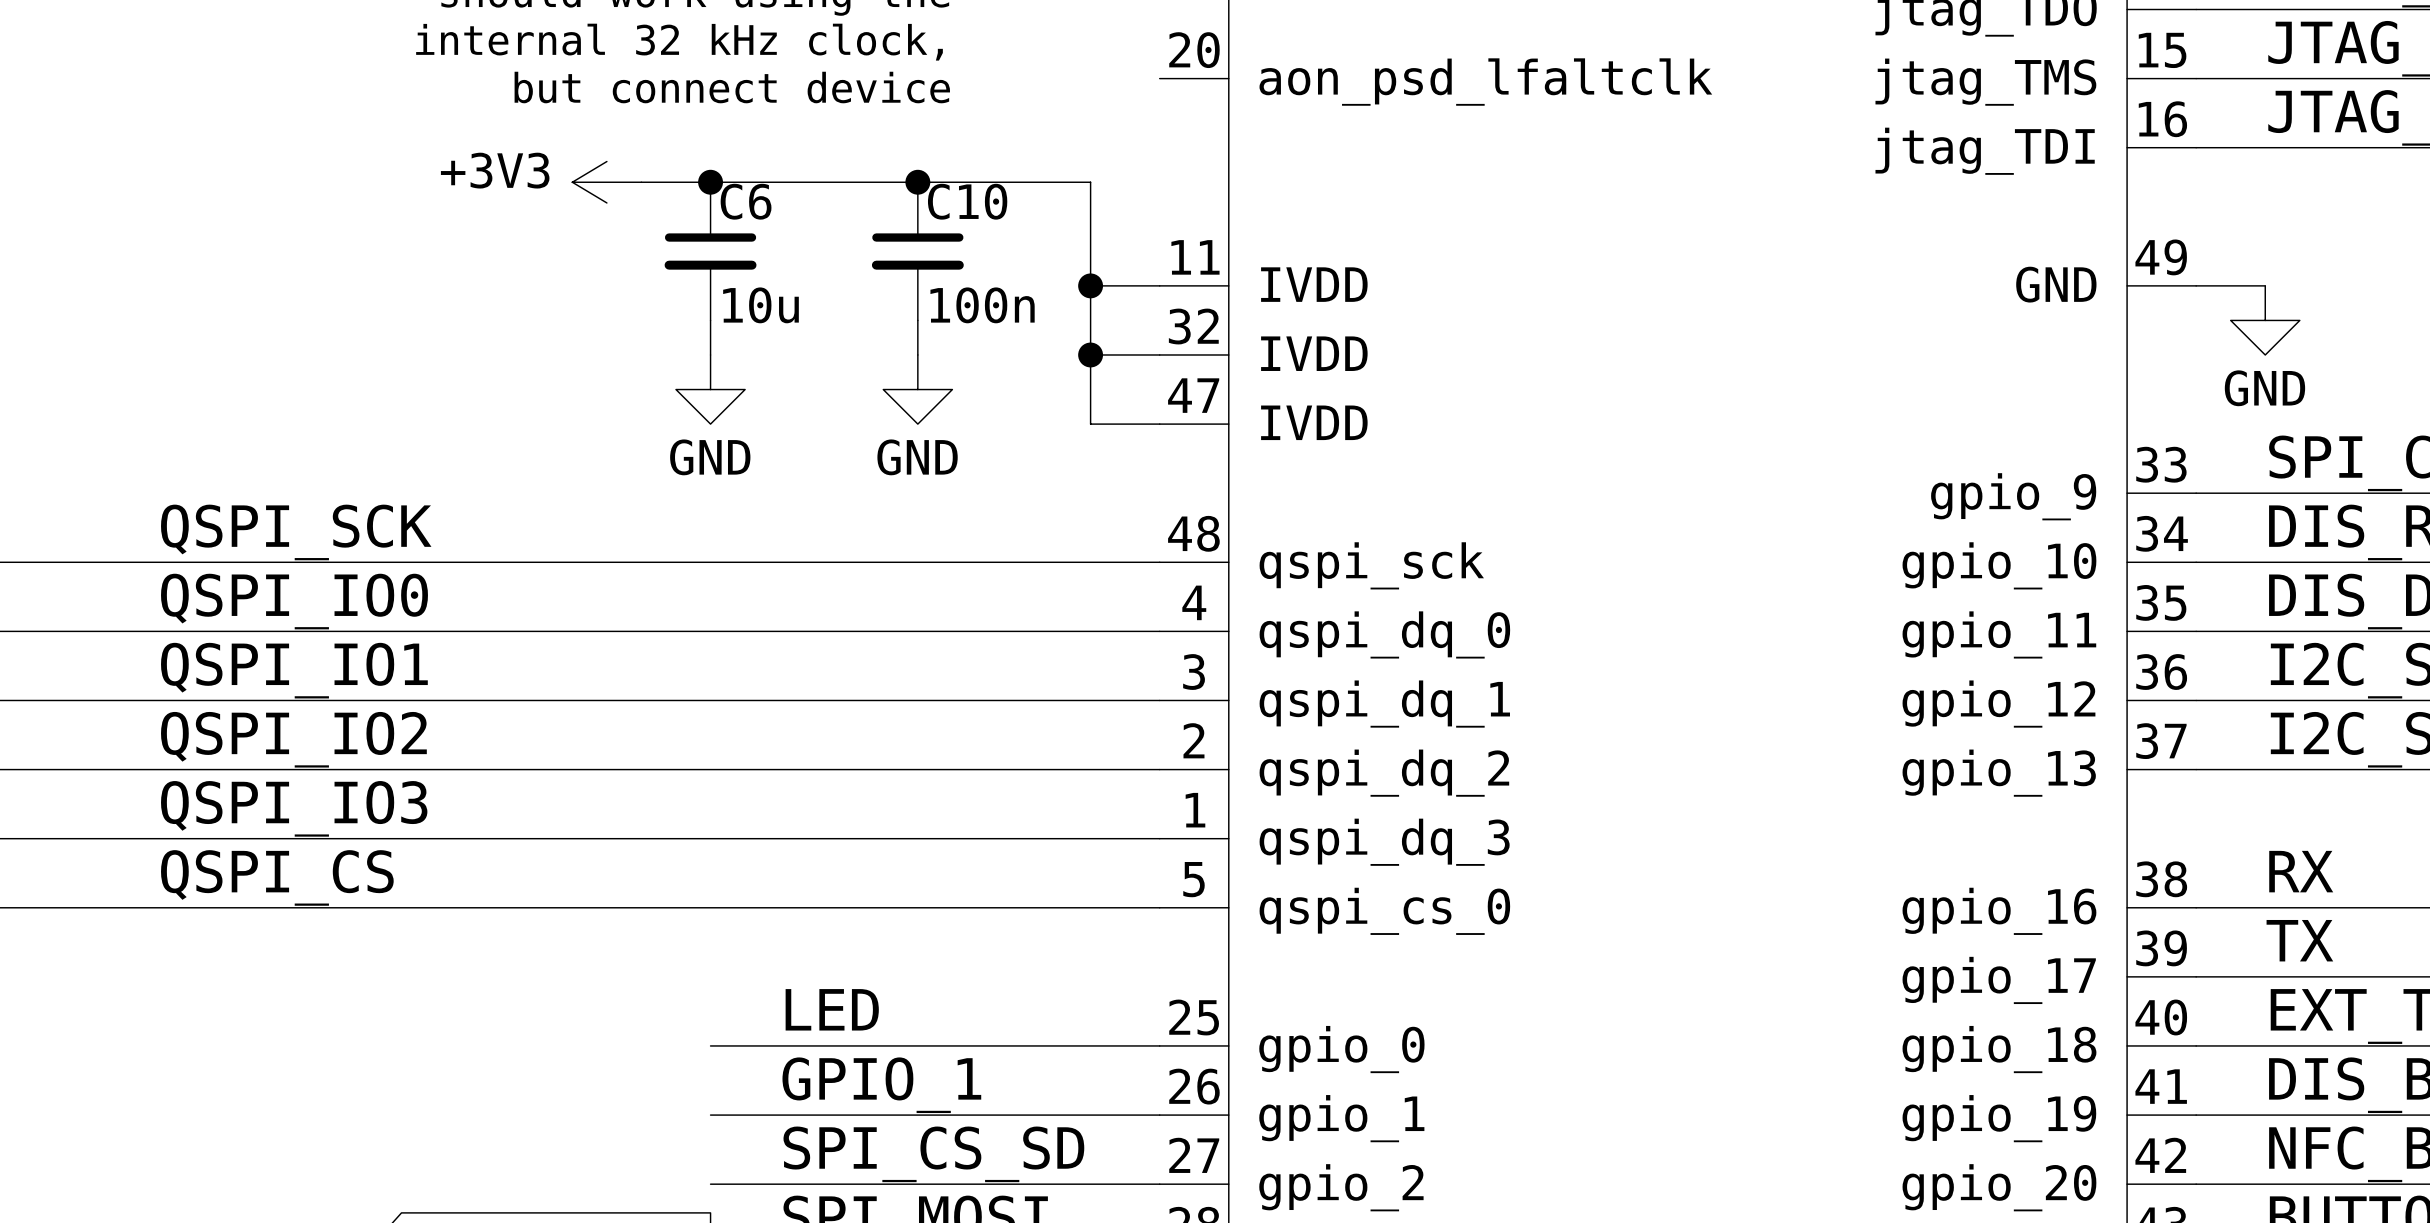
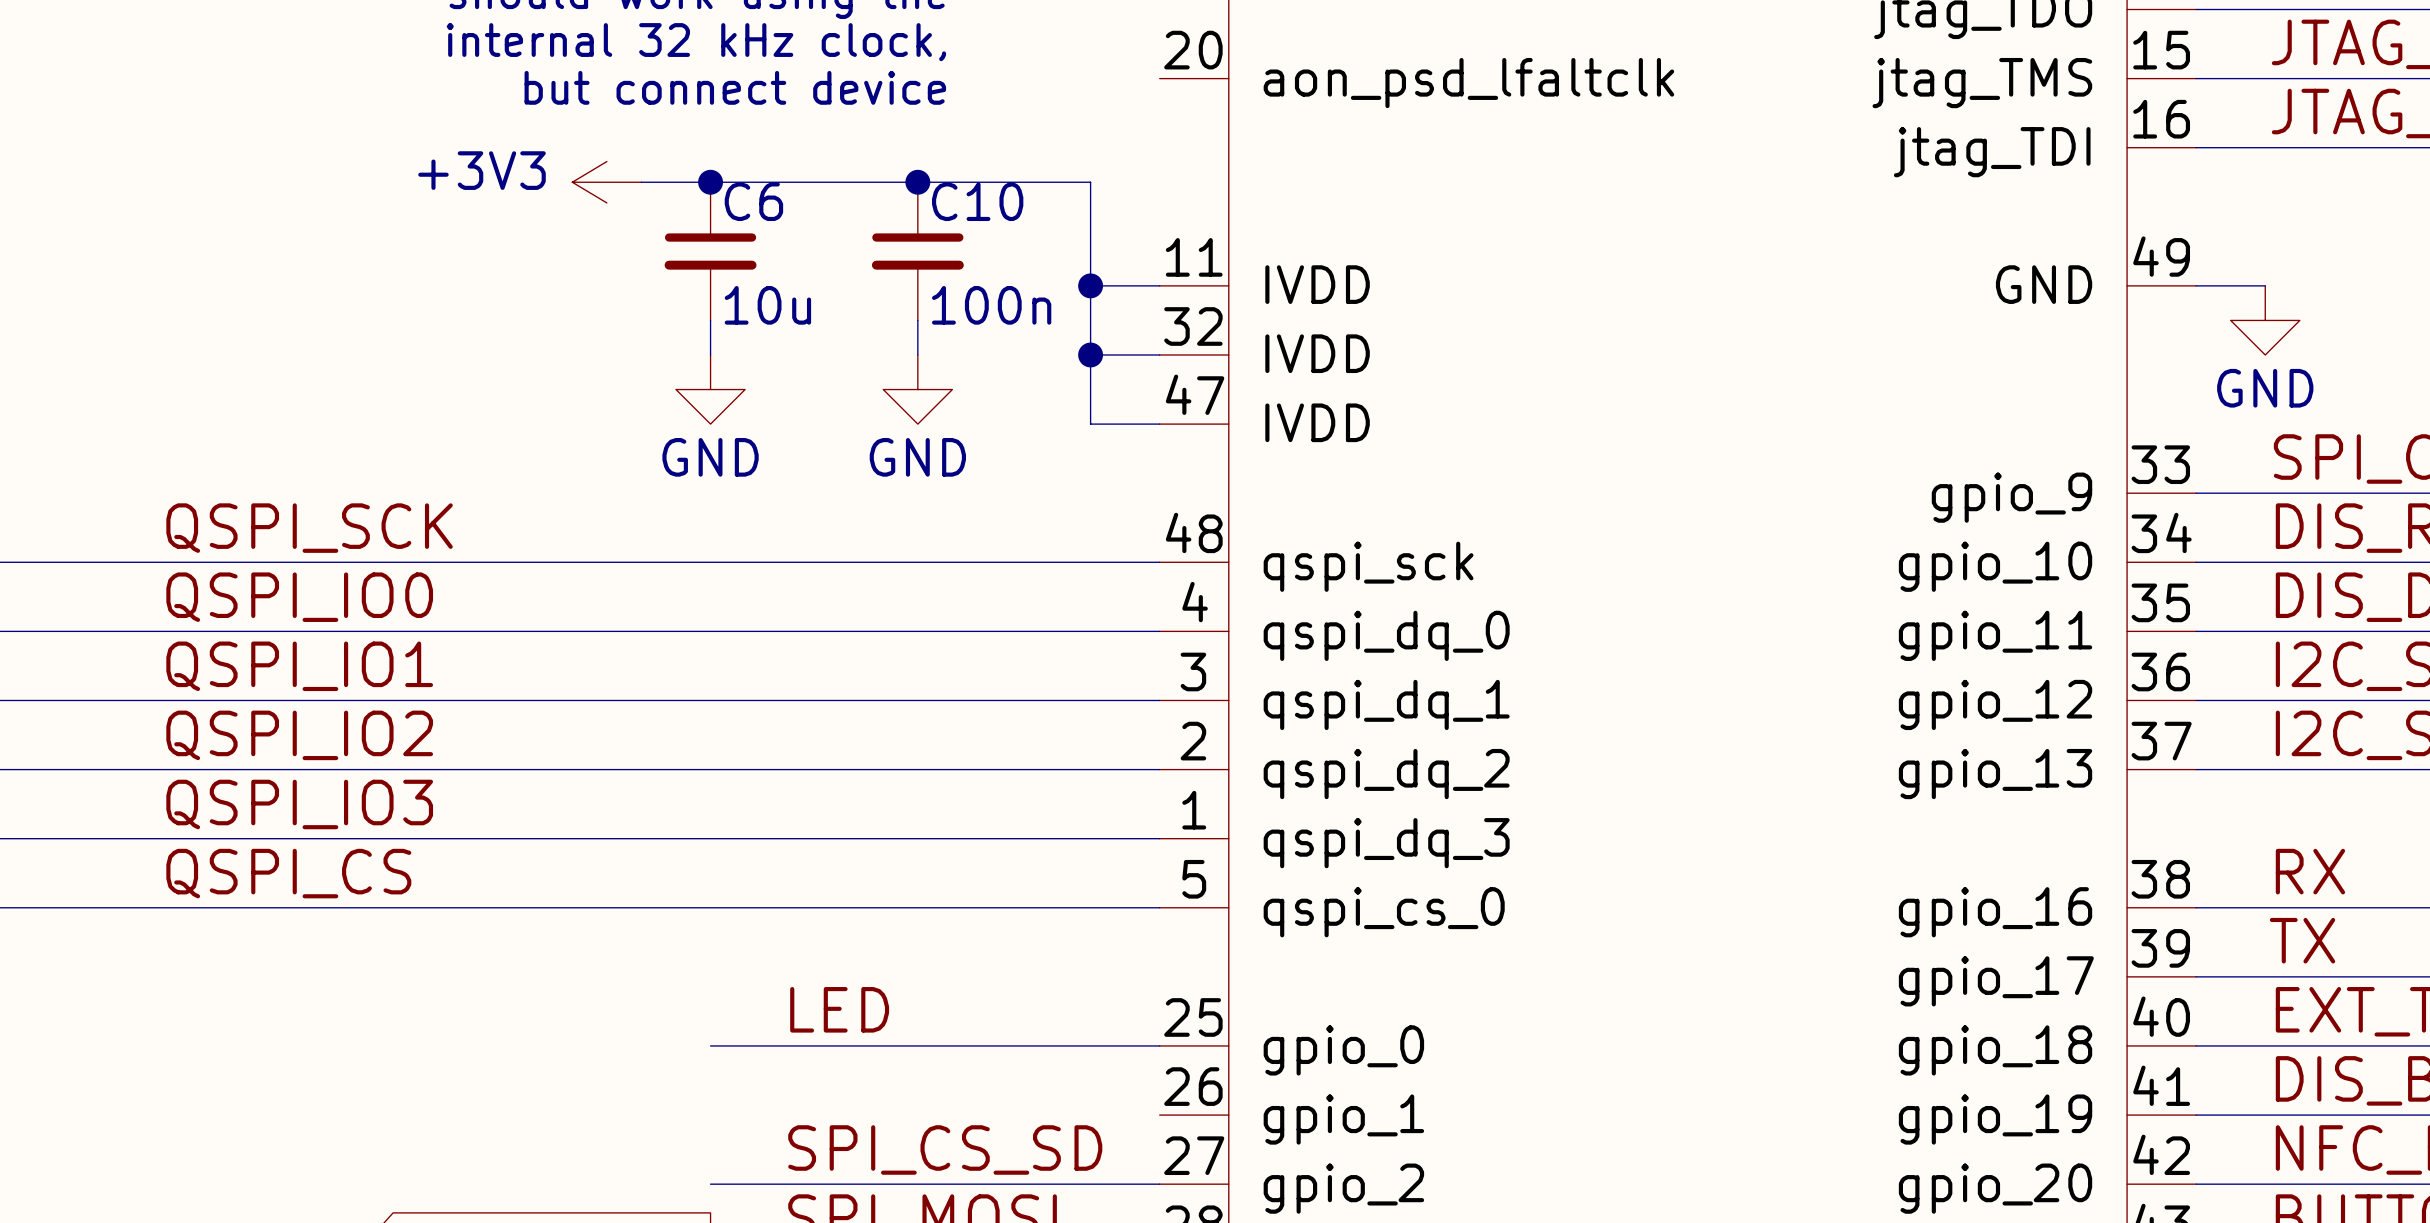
label: GPIO_1 (881, 1085) -> none
wire: (710, 1115) (1159, 1115) -> none

